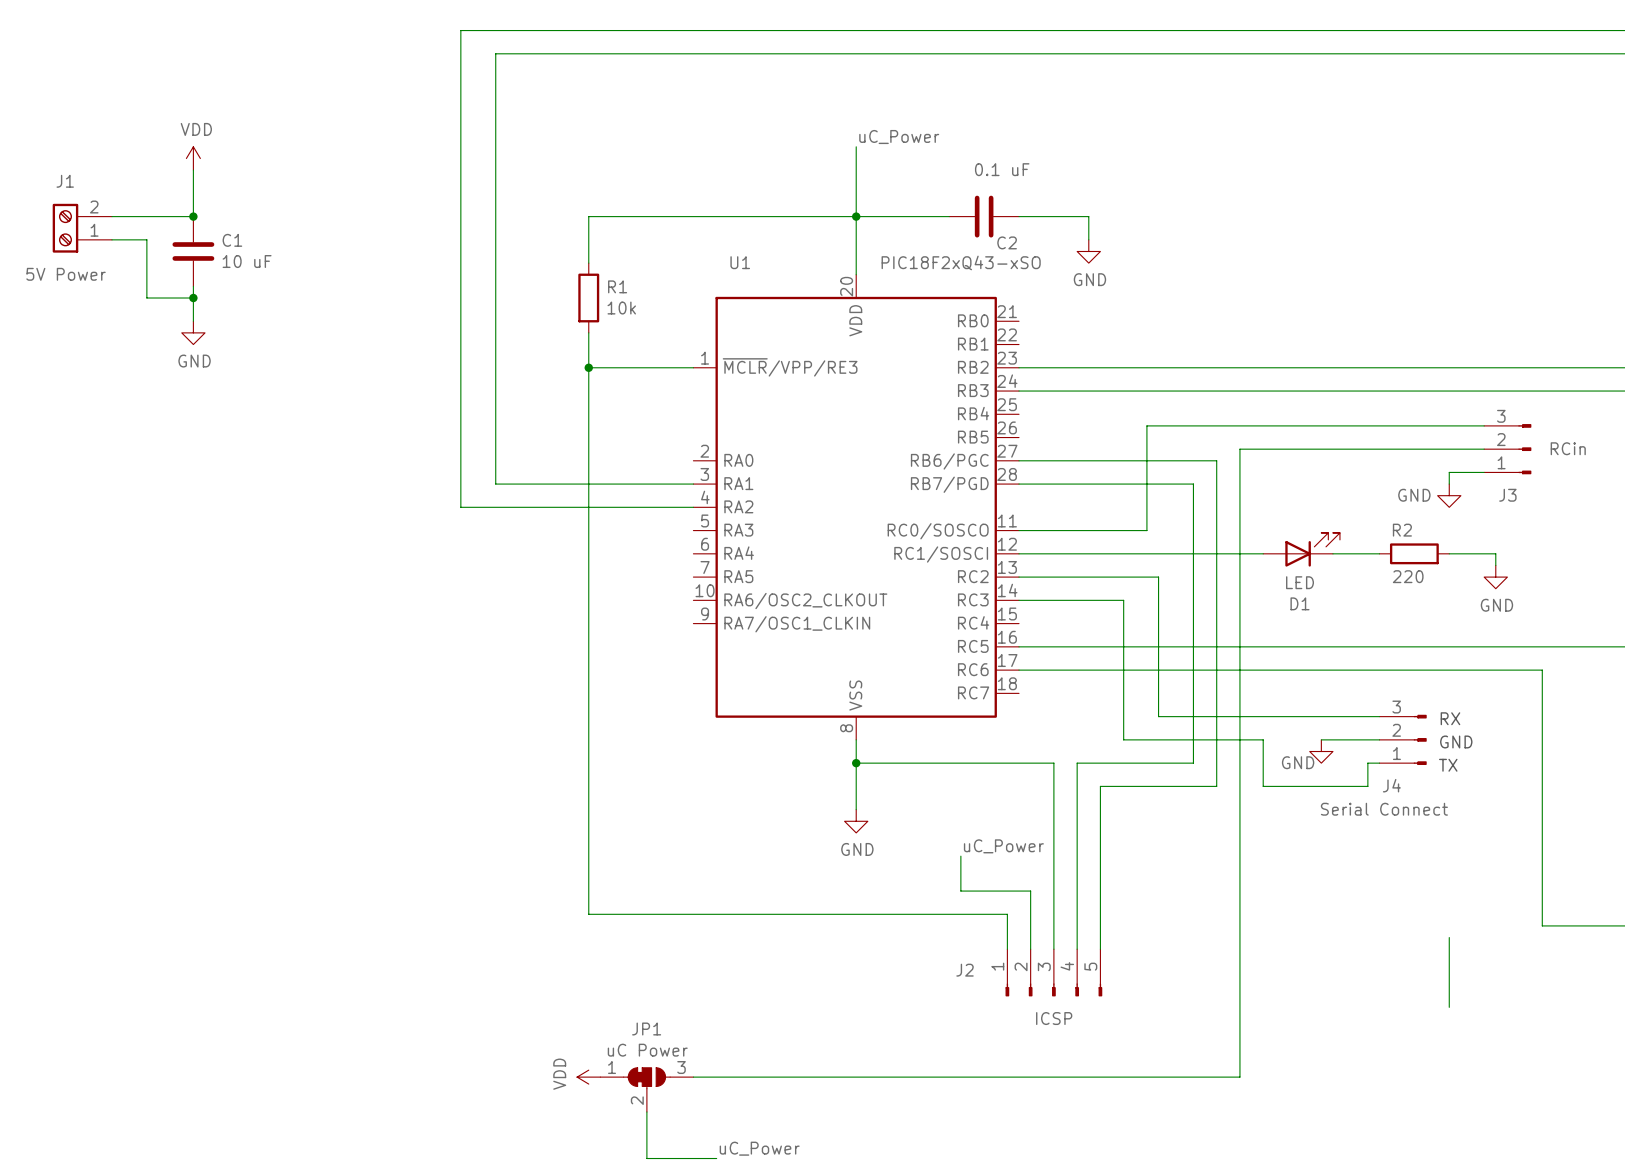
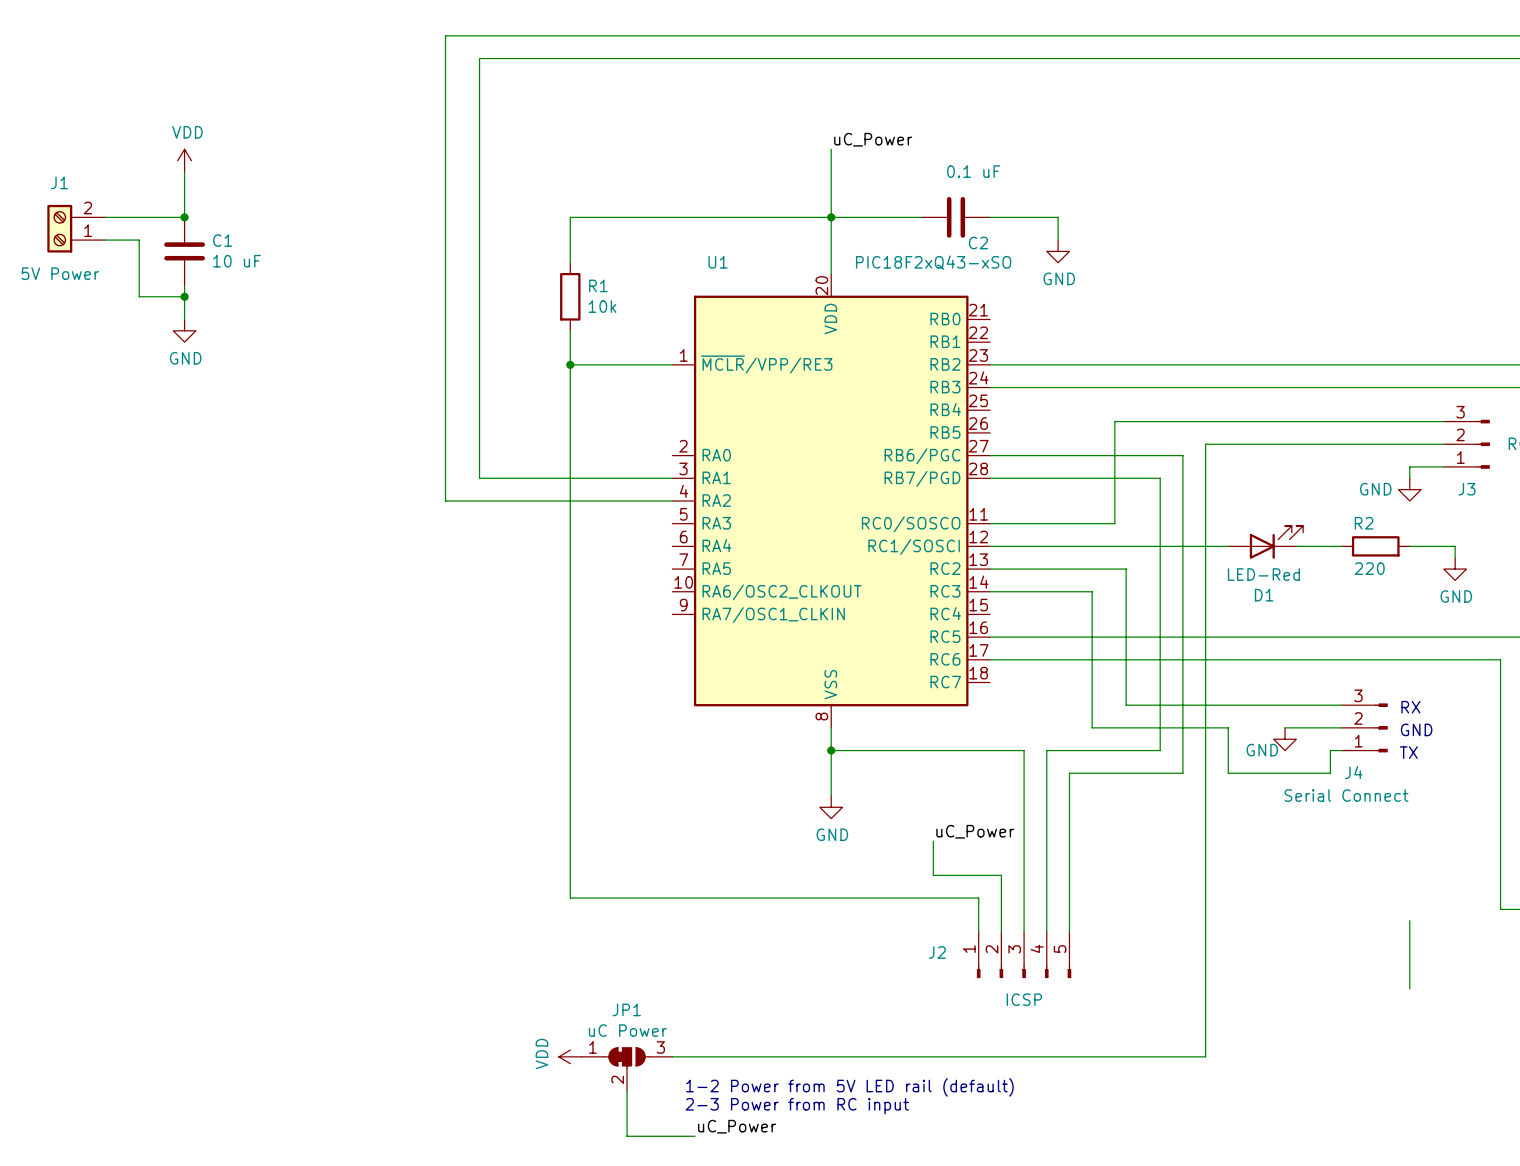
D1 value: LED (1300, 582) -> LED-Red (1263, 574)
text: none -> 1-2 Power from 5V LED rail (default) (849, 1087)
text: none -> 2-3 Power from RC input (797, 1106)

